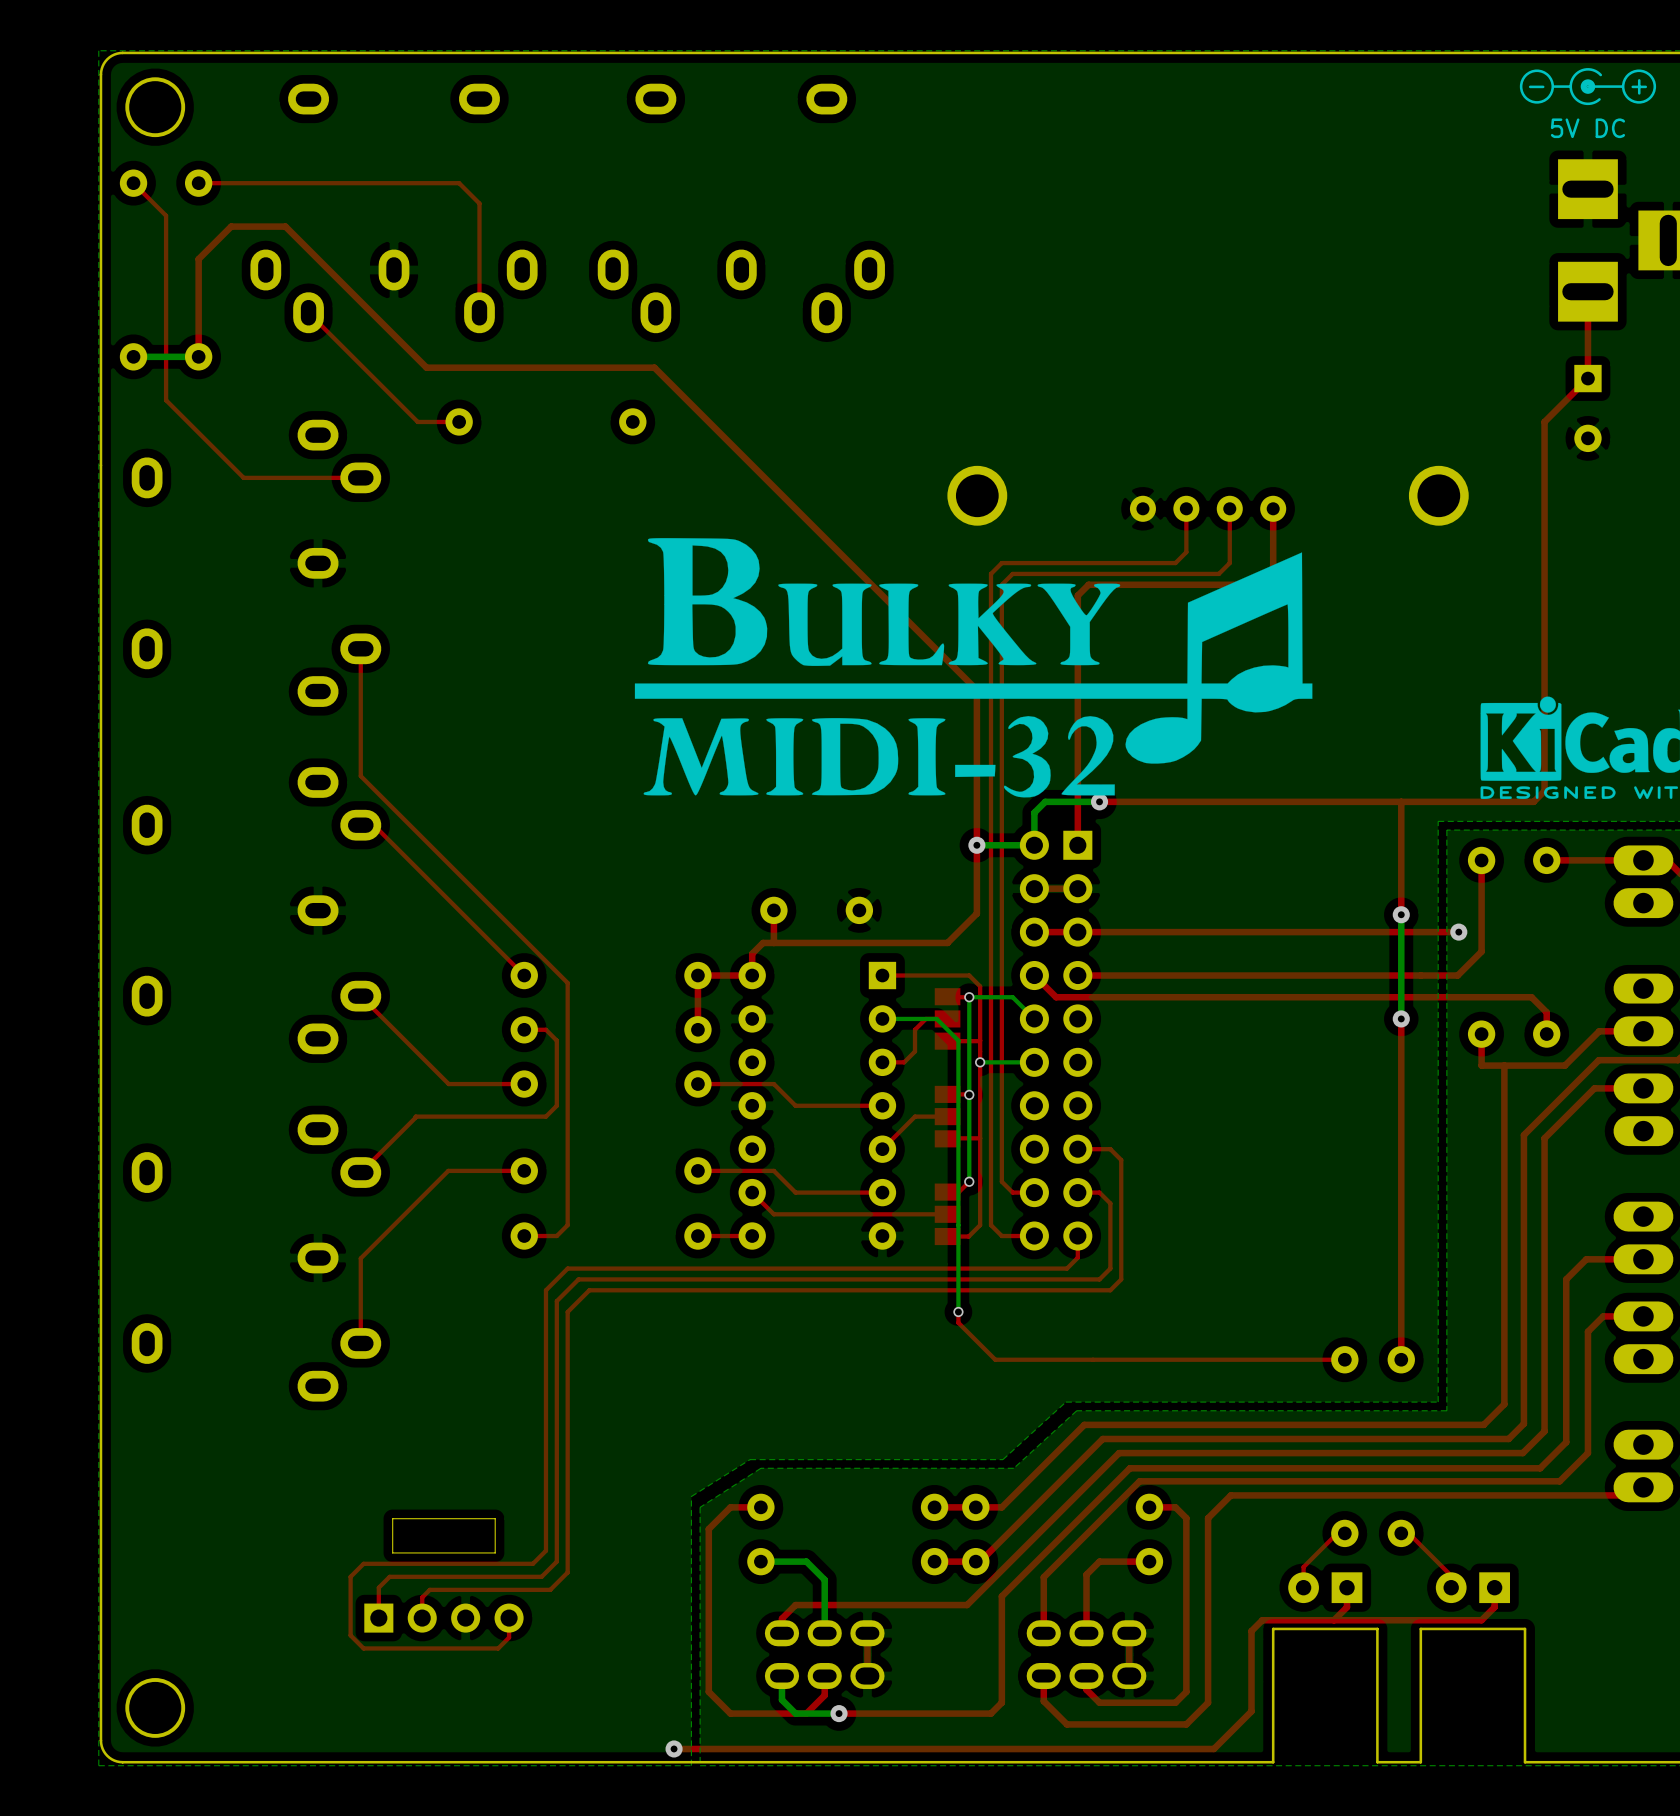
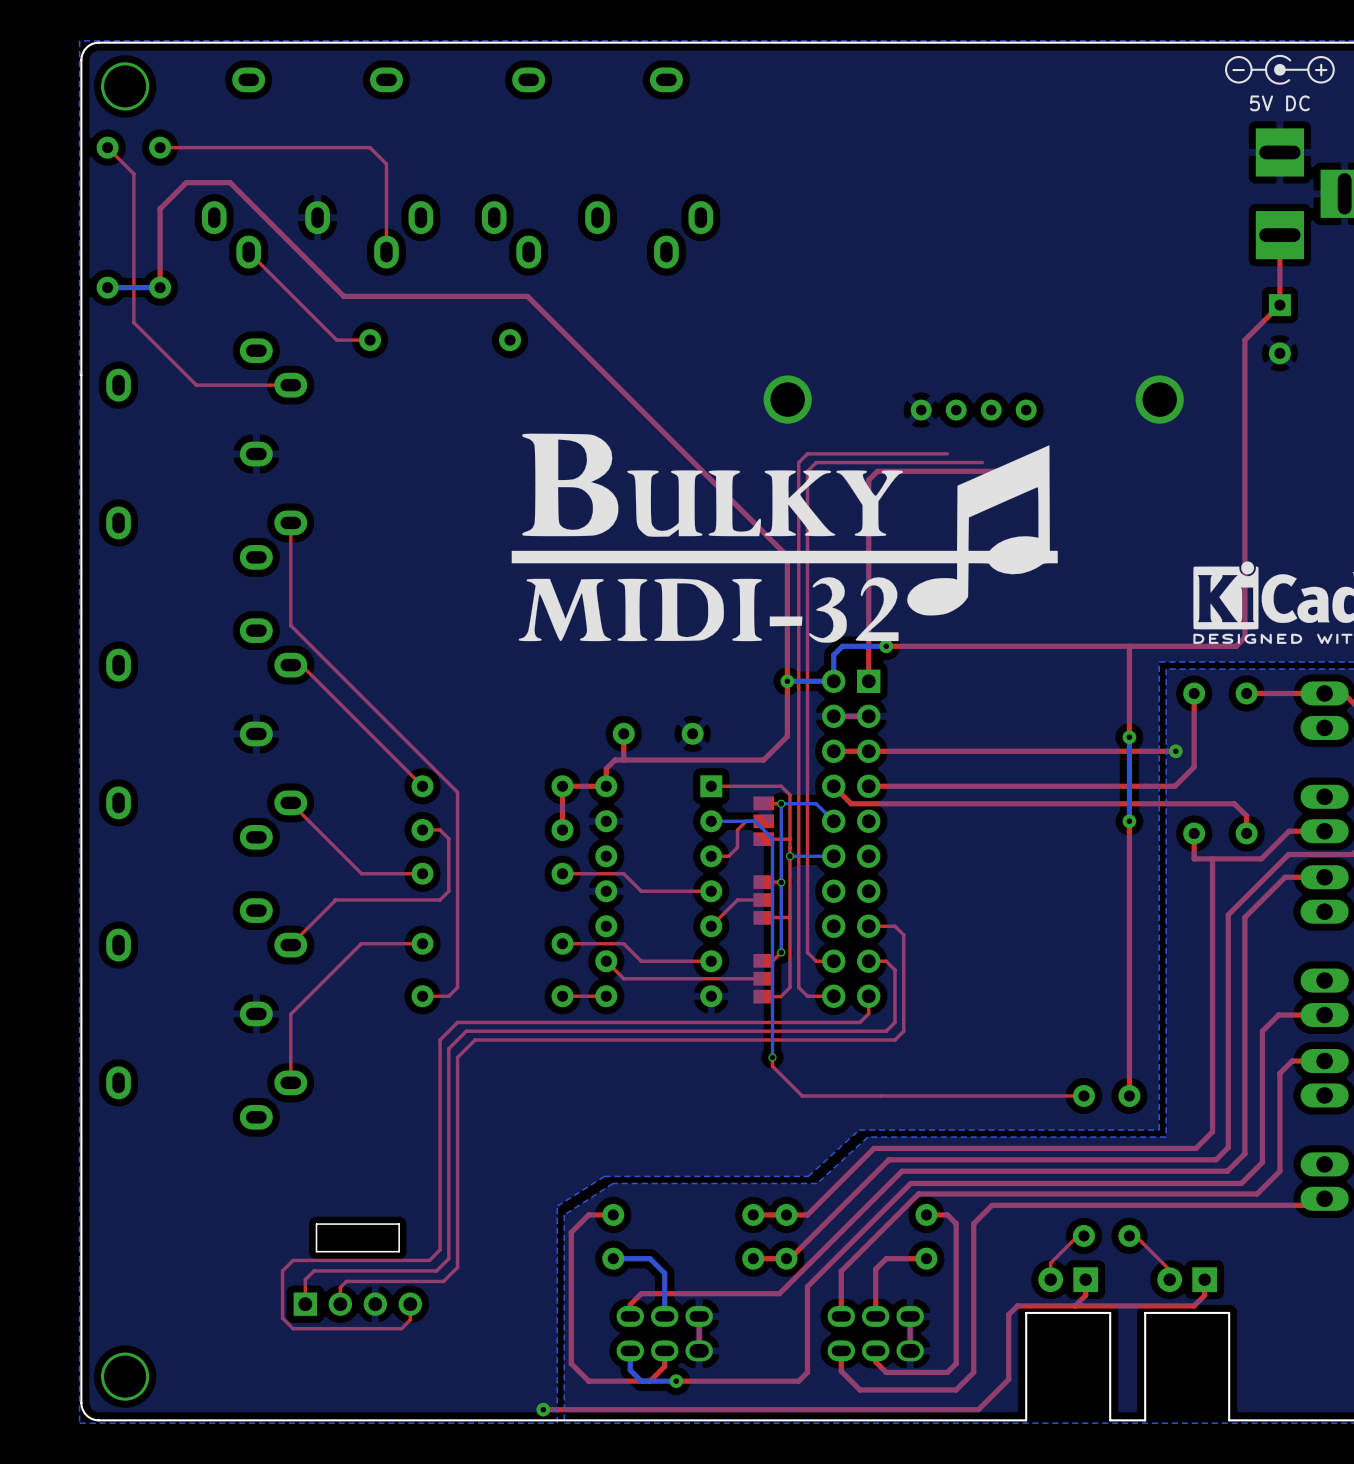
top track: (1186, 508) (1186, 552) (1175, 563) -> none
top track: (1229, 508) (1229, 563) (1218, 573) -> none
top track: (1273, 508) (1273, 573) (1262, 584) -> none

